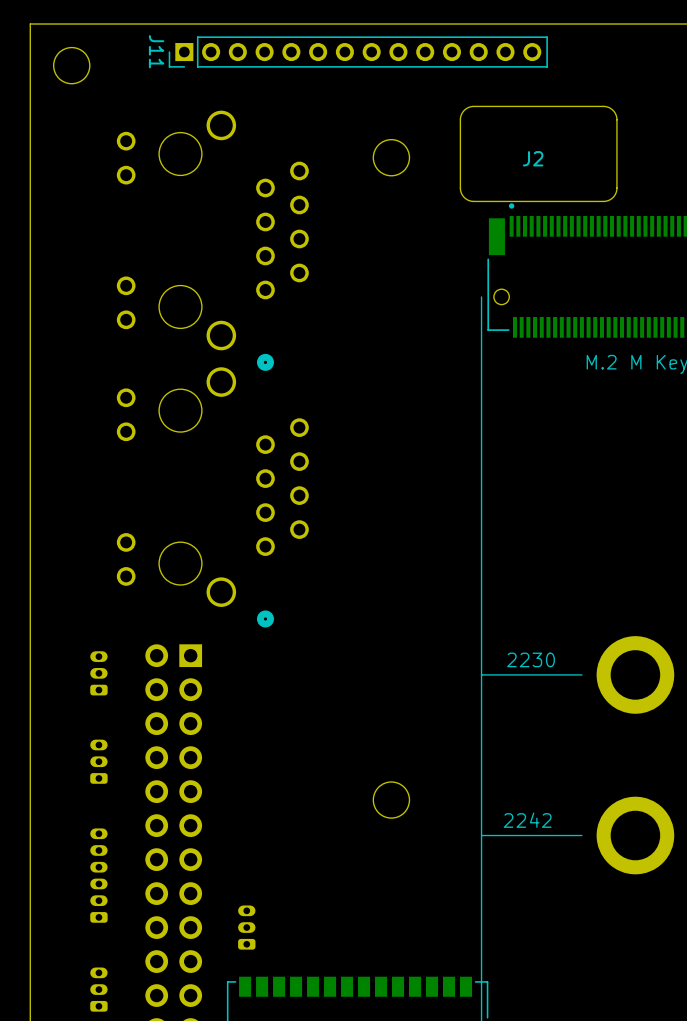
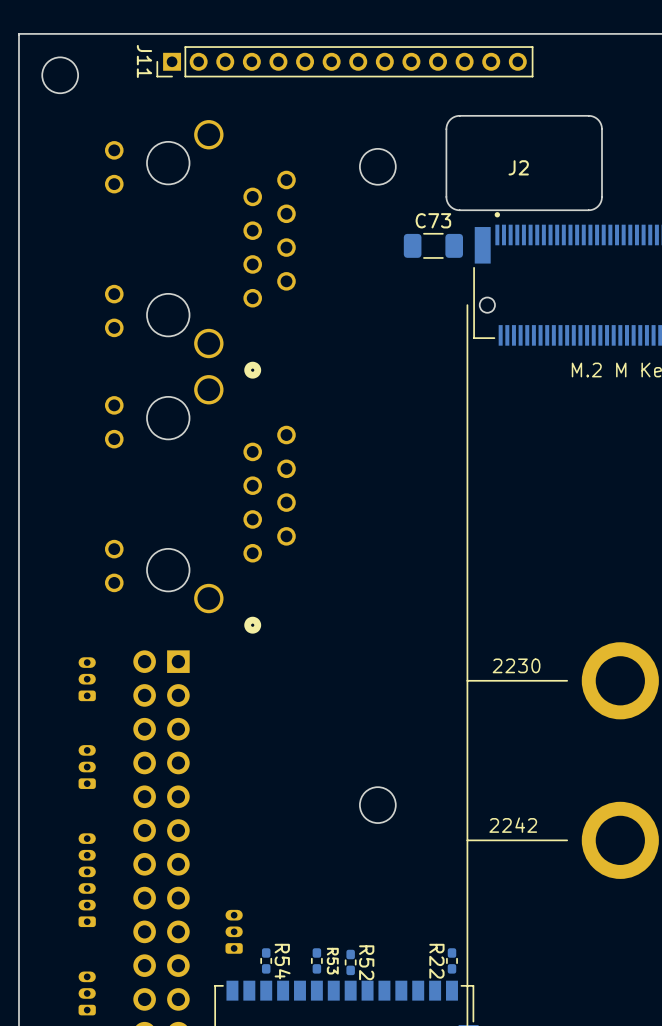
C73: none -> (433, 245)
R54: none -> (266, 960)
R53: none -> (316, 960)
R22: none -> (451, 960)
R52: none -> (350, 962)

